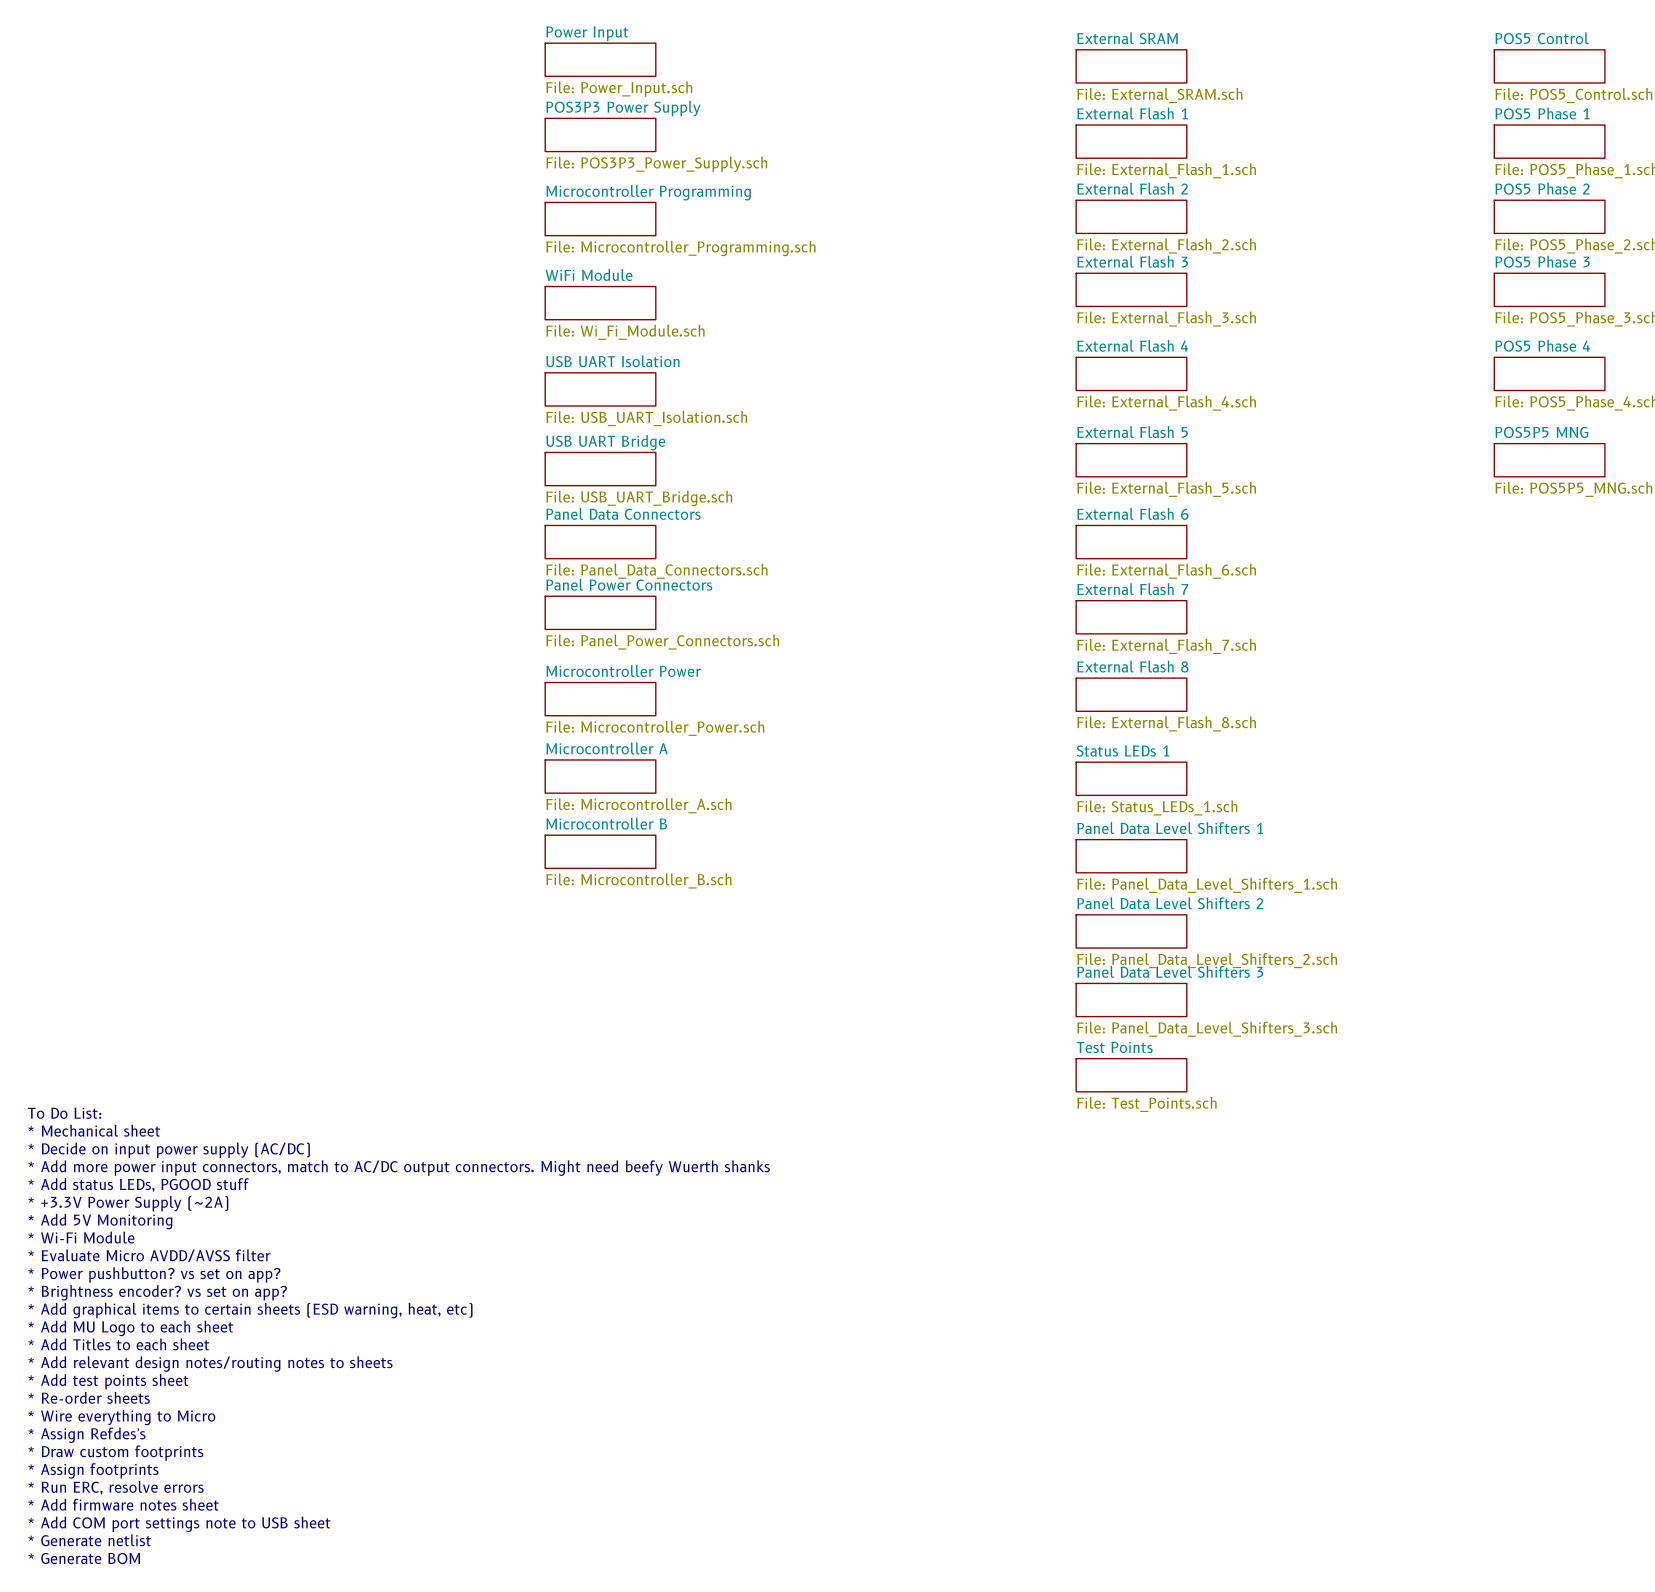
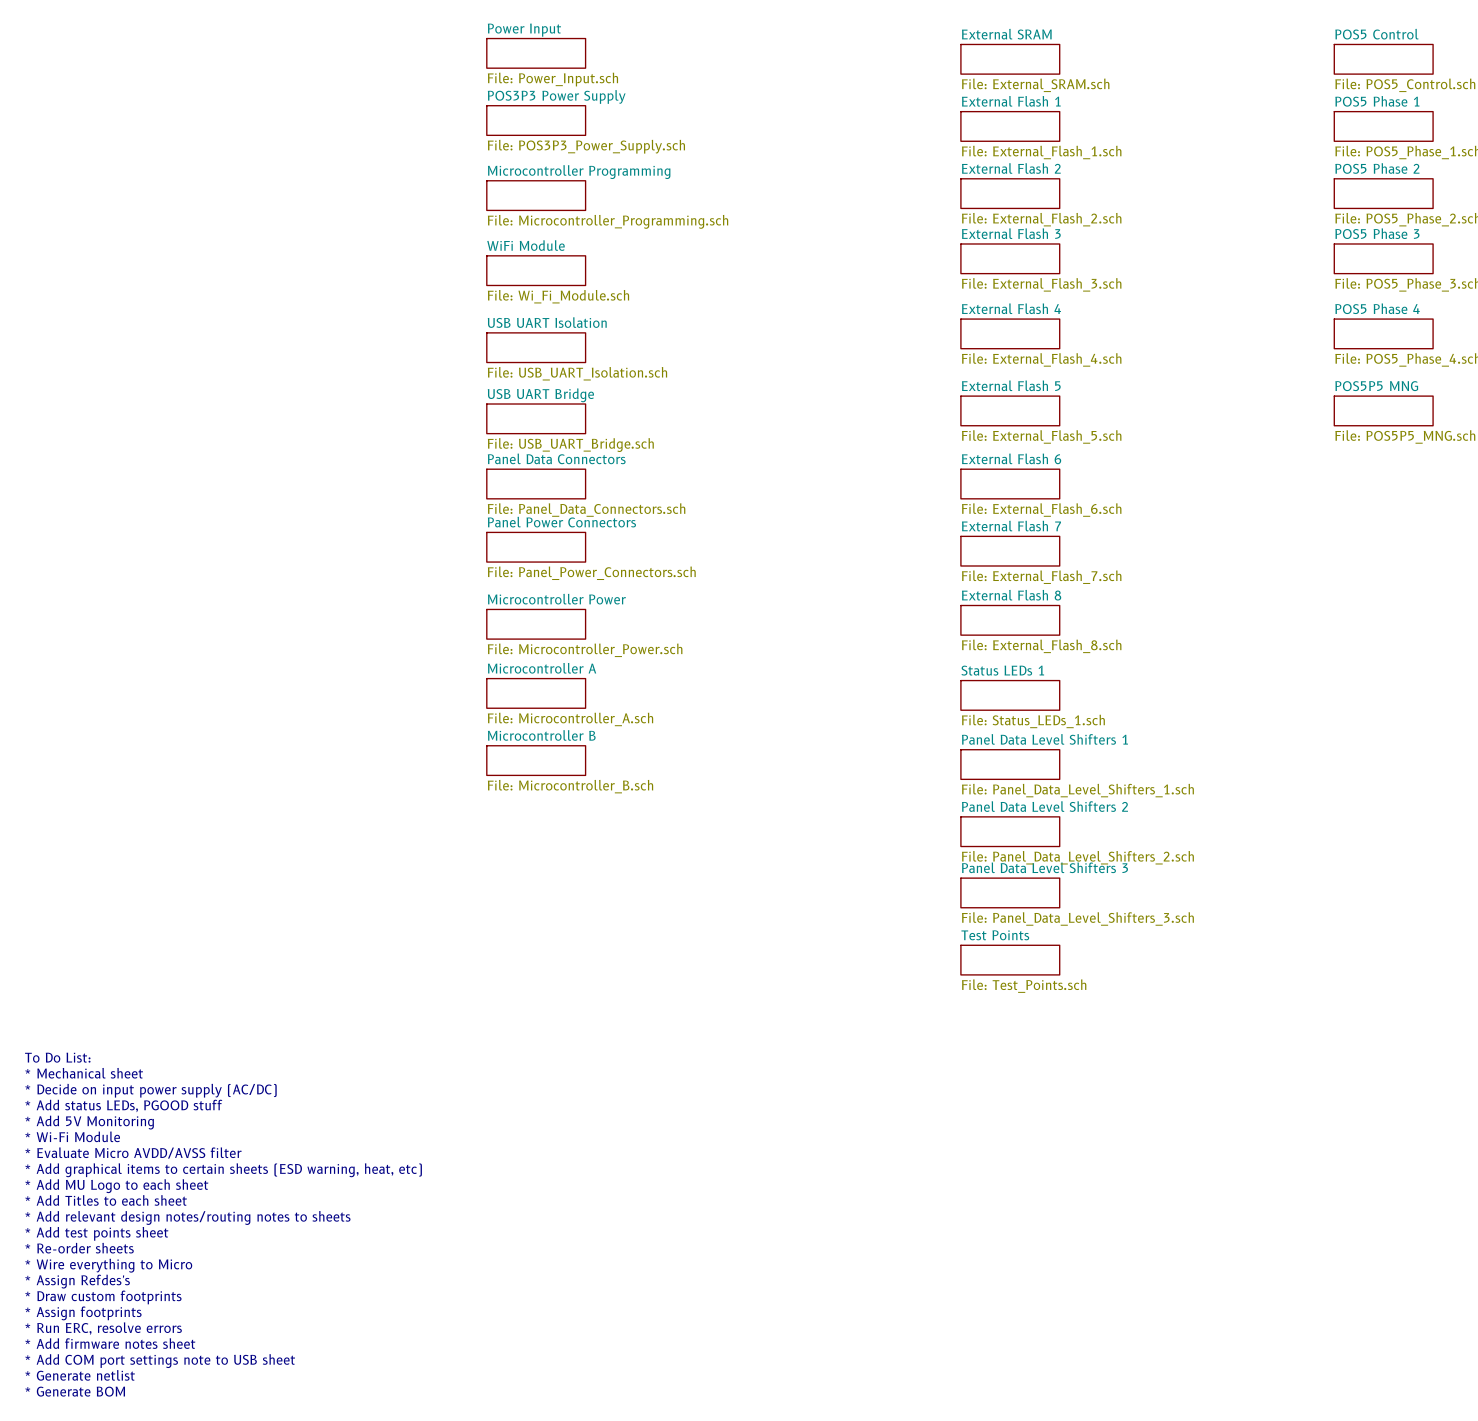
text: To Do List: (64, 1113) -> none
text: * Mechanical sheet (94, 1130) -> none
text: * Decide on input power supply (AC/DC) (169, 1150) -> none
text: * Add more power input connectors, match to AC/DC output connectors. Might need beefy Wuerth shanks (399, 1168) -> none
text: * Add status LEDs, PGOOD stuff (138, 1185) -> To Do List: (57, 1057)
text: * +3.3V Power Supply (~2A) (128, 1203) -> * Mechanical sheet (84, 1073)
text: * Add 5V Monitoring (100, 1221) -> * Decide on input power supply (AC/DC) (151, 1090)
text: * Wi-Fi Module (81, 1237) -> * Add status LEDs, PGOOD stuff (123, 1105)
text: * Evaluate Micro AVDD/AVSS filter (149, 1255) -> * Add 5V Monitoring (89, 1122)
text: * Power pushbutton? vs set on app? (154, 1274) -> * Wi-Fi Module (72, 1136)
text: * Brightness encoder? vs set on app? (157, 1292) -> * Evaluate Micro AVDD/AVSS filter (133, 1153)

